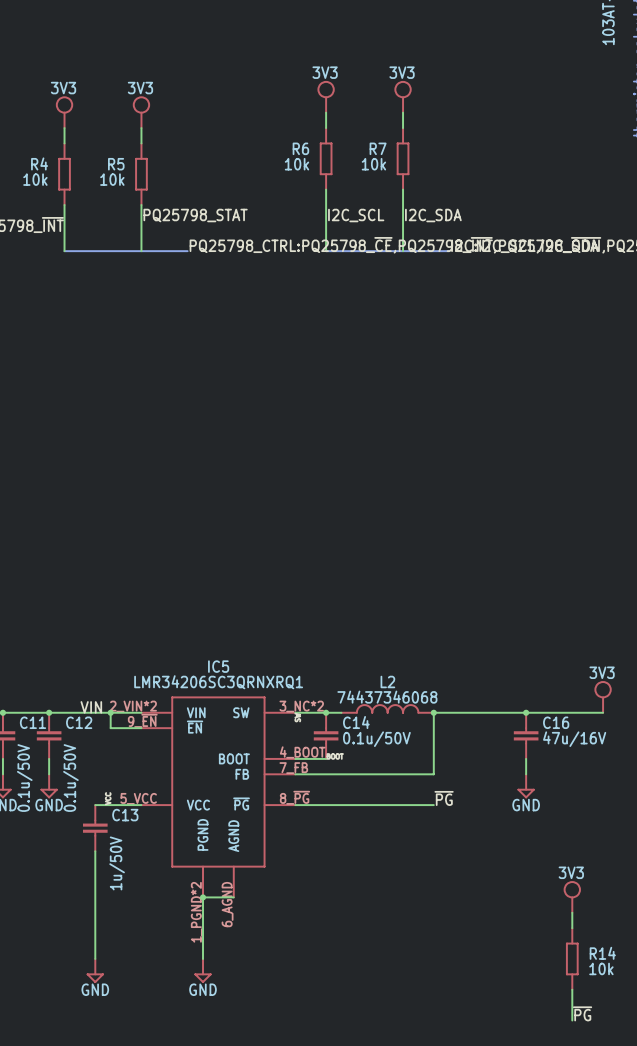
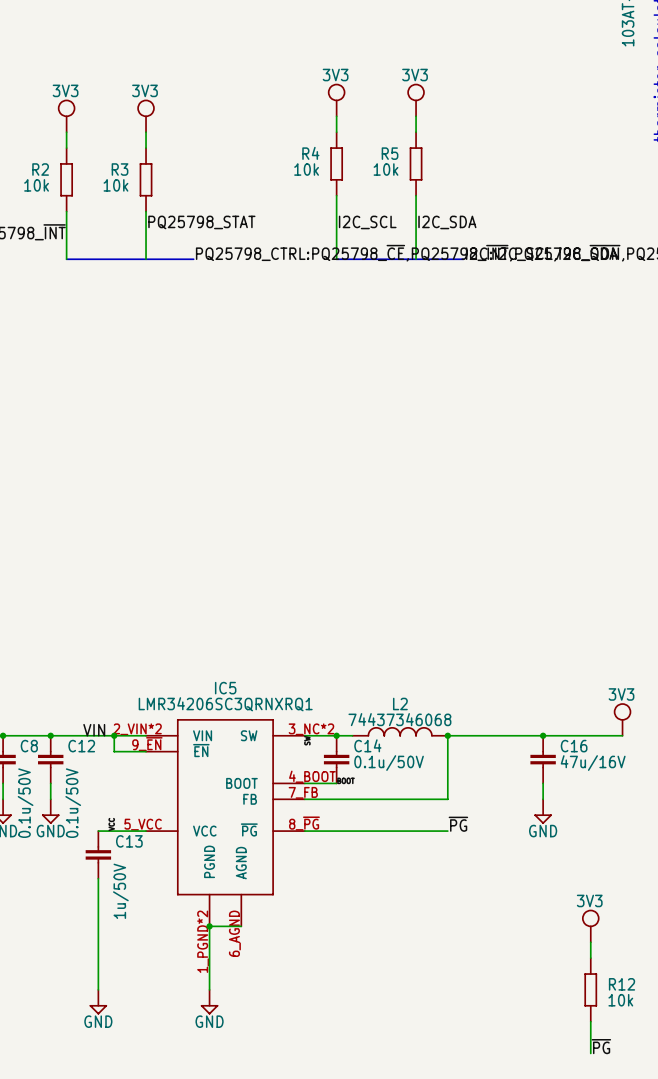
R6 name: R6 (300, 148) -> R4 (310, 153)
R7 name: R7 (378, 148) -> R5 (390, 153)
R4 name: R4 (39, 163) -> R2 (40, 169)
R5 name: R5 (116, 164) -> R3 (120, 169)
C11 name: C11 (33, 722) -> C8 (29, 746)
R14 name: R14 (602, 953) -> R12 (622, 984)

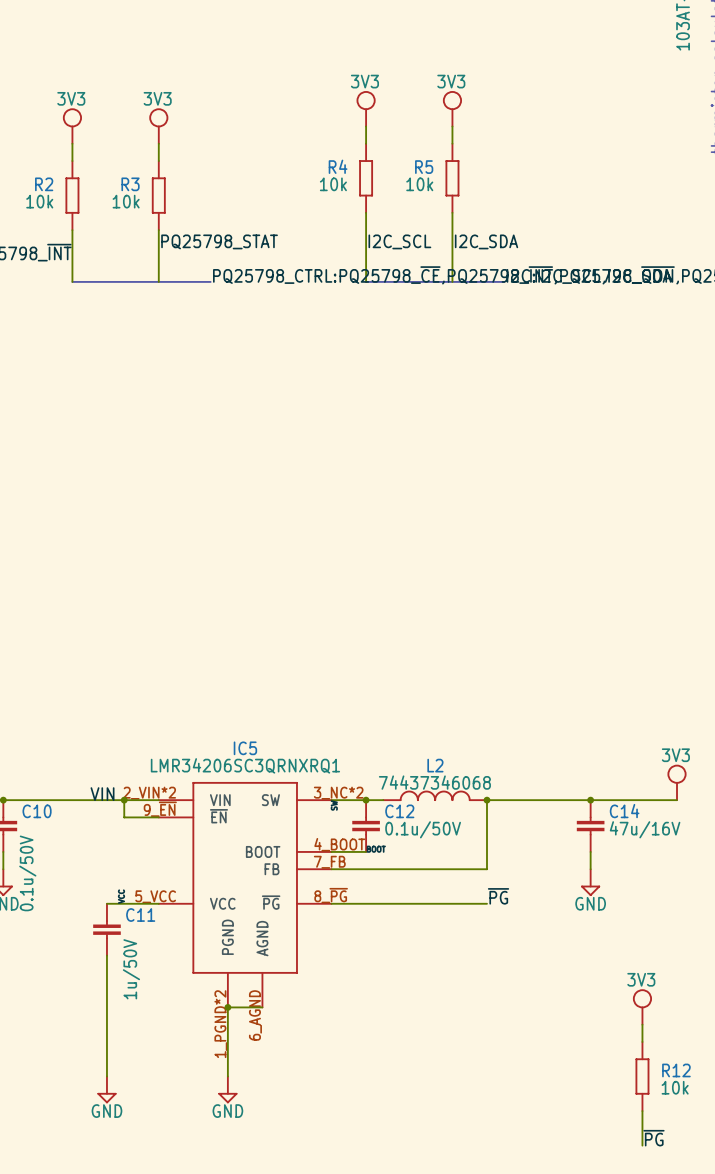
junction: (50, 735) -> none
C14 name: C14 (367, 745) -> C12 (399, 811)
C8 name: C8 (29, 746) -> C10 (37, 811)
C16 name: C16 (574, 746) -> C14 (624, 811)
C12: 0.1u/50V (50, 759) -> none
wire: (50, 783) (50, 799) -> none
power symbol: GND (50, 811) -> none
C13 name: C13 (129, 841) -> C11 (140, 915)

